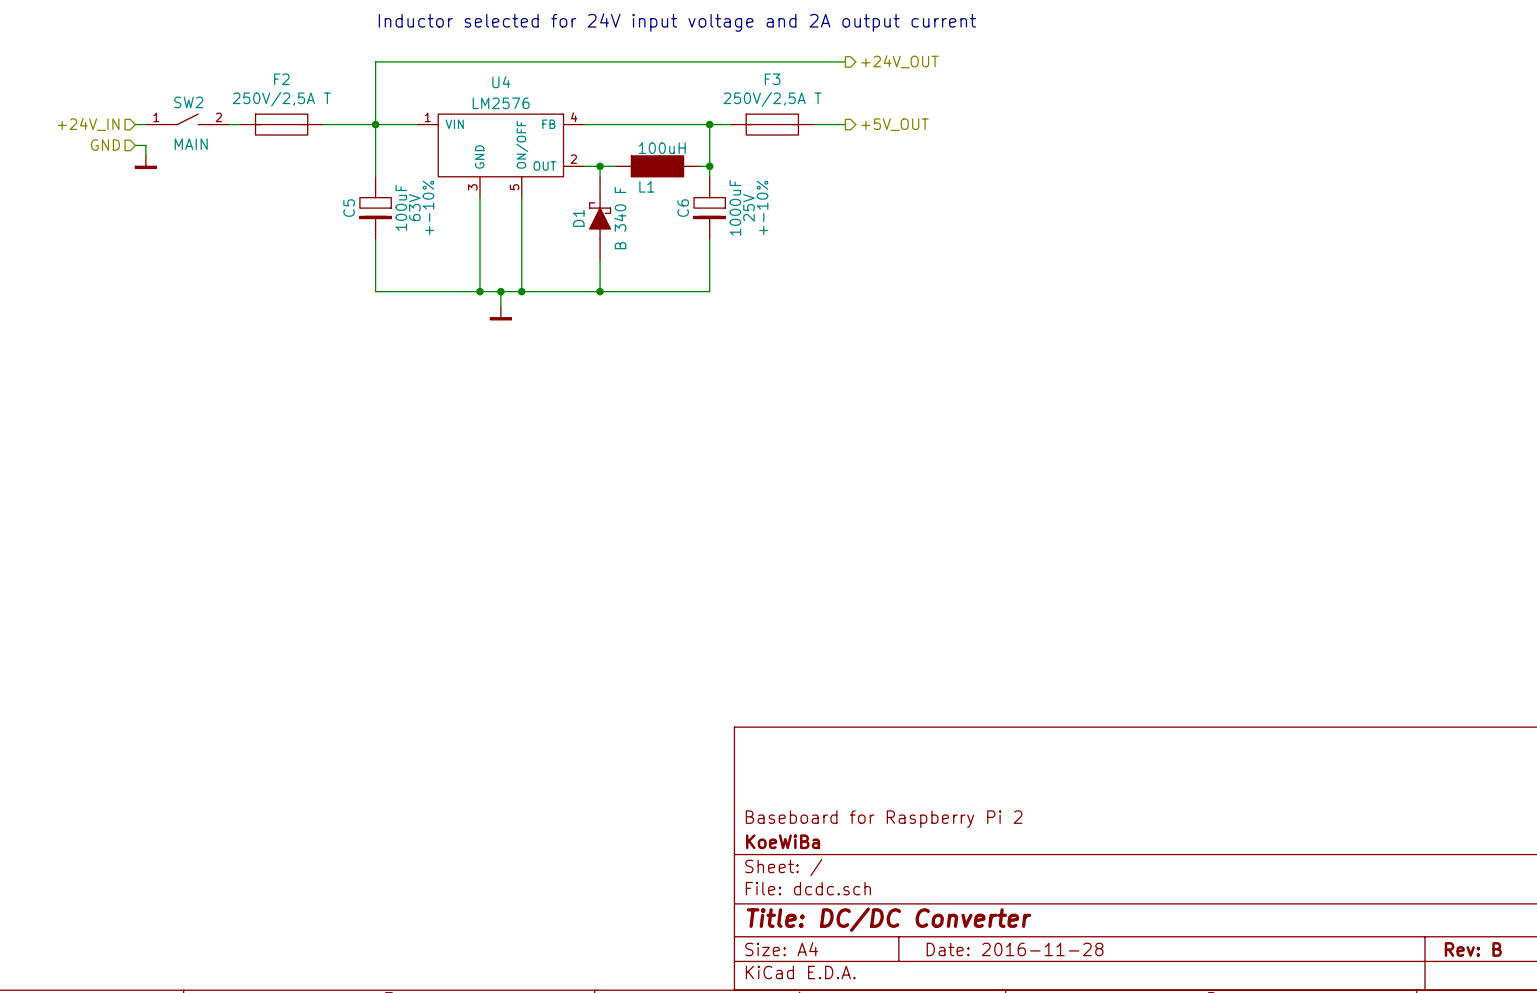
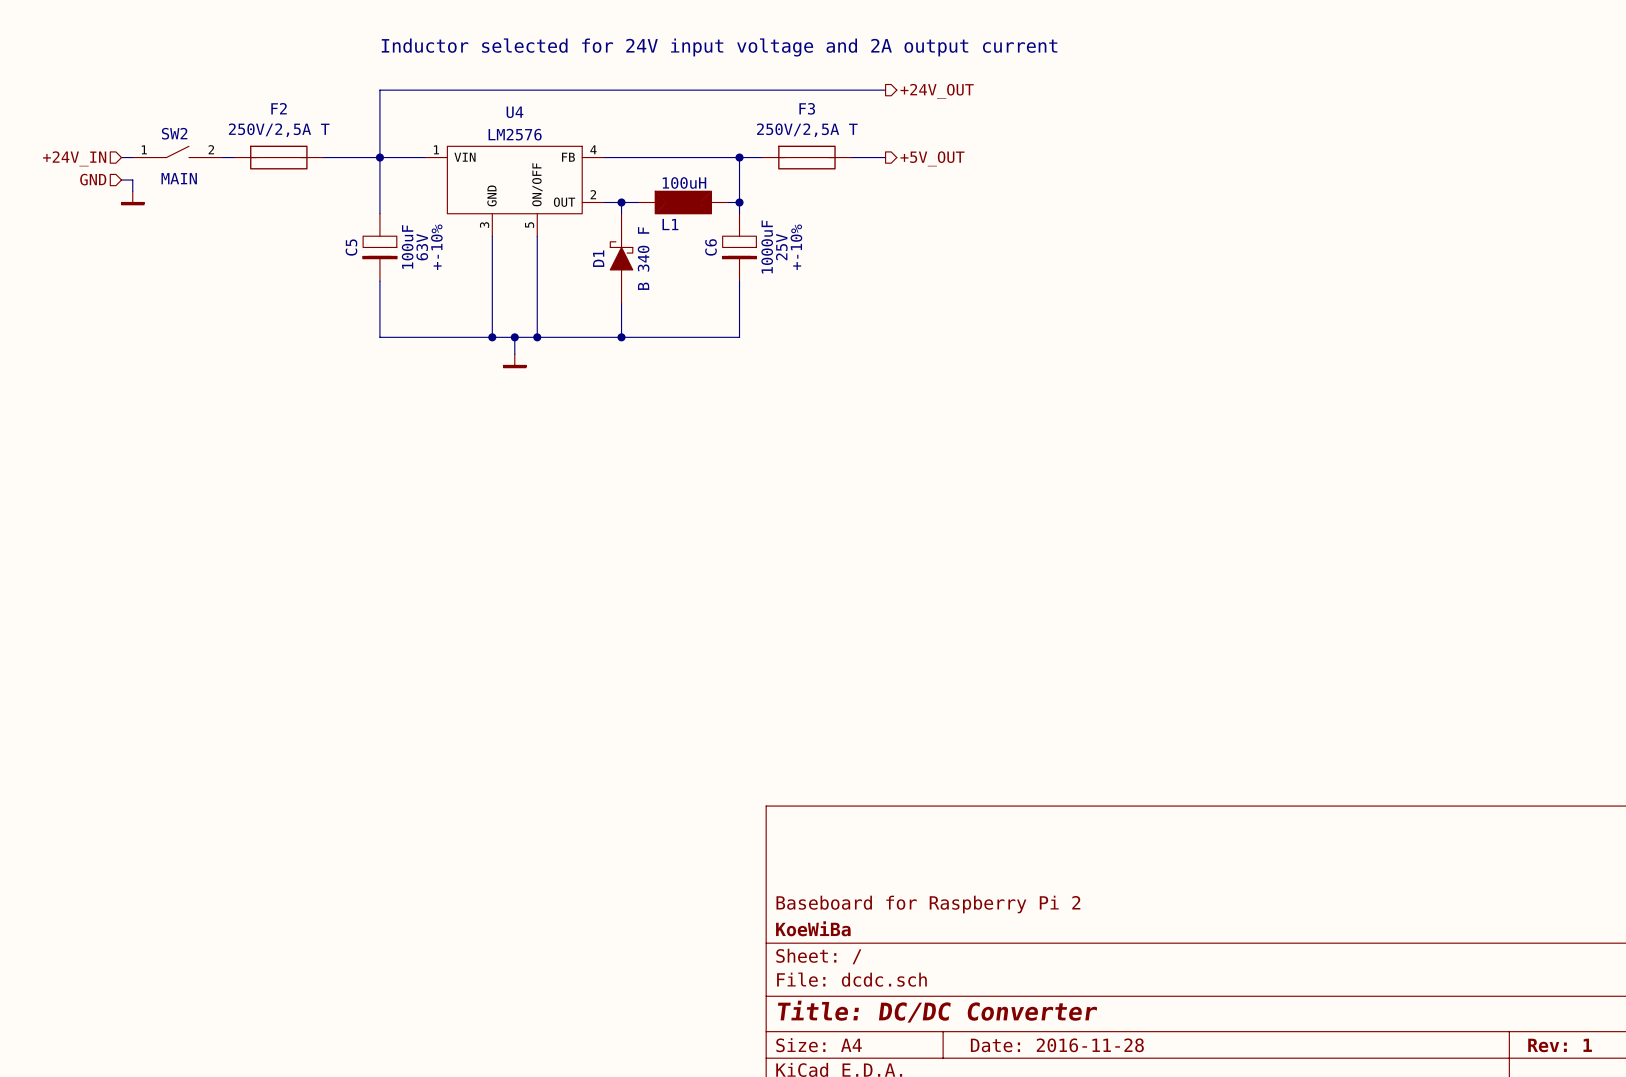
title block: Rev: B (1473, 949) -> Rev: 1 (1560, 1045)

